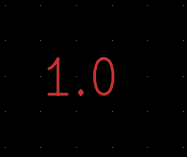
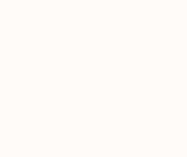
text: 1.0 (80, 76) -> none

